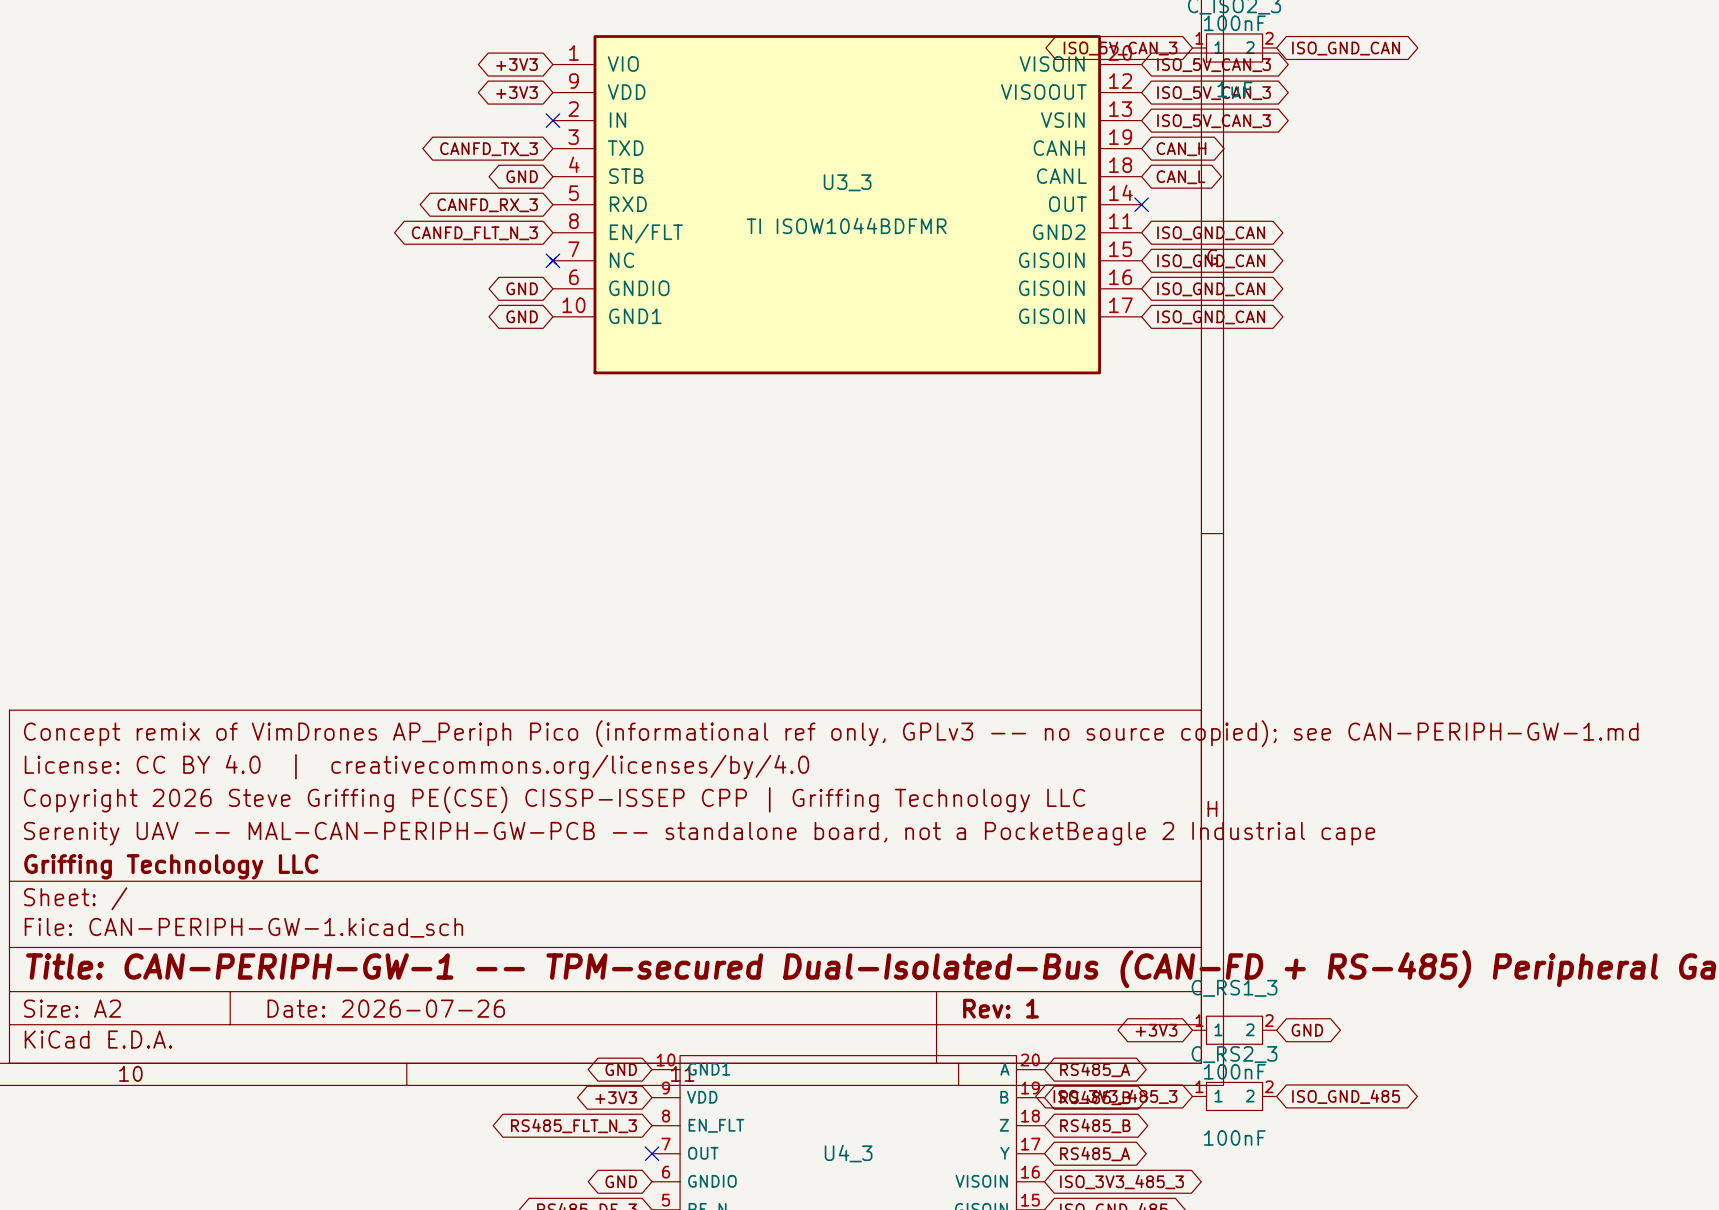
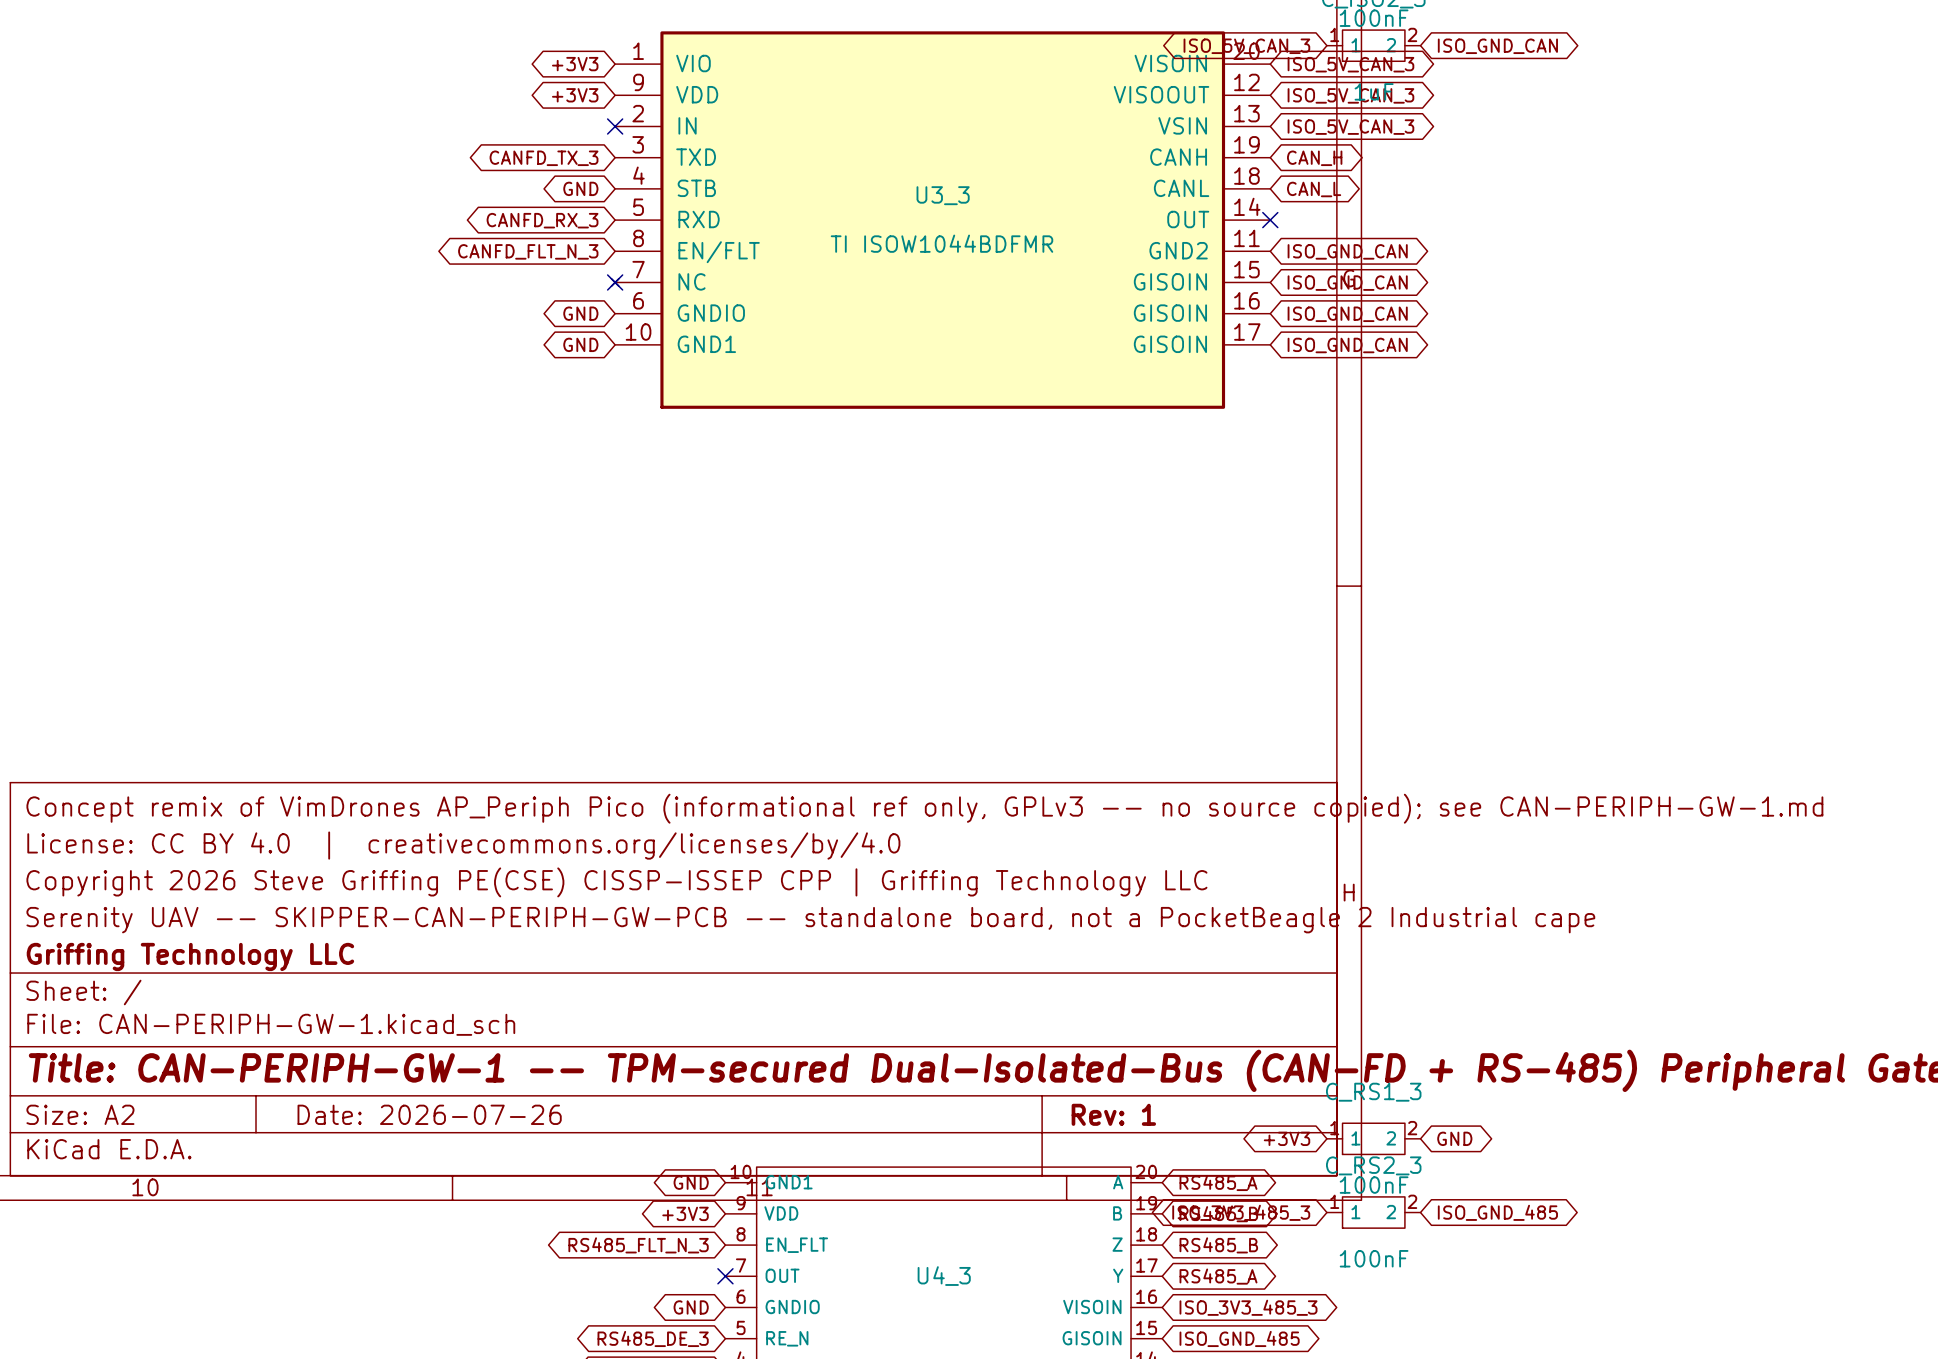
title block: Serenity UAV -- MAL-CAN-PERIPH-GW-PCB -- standalone board, not a PocketBeagle 2 Industrial cape (699, 833) -> Serenity UAV -- SKIPPER-CAN-PERIPH-GW-PCB -- standalone board, not a PocketBeagle 2 Industrial cape (810, 920)

